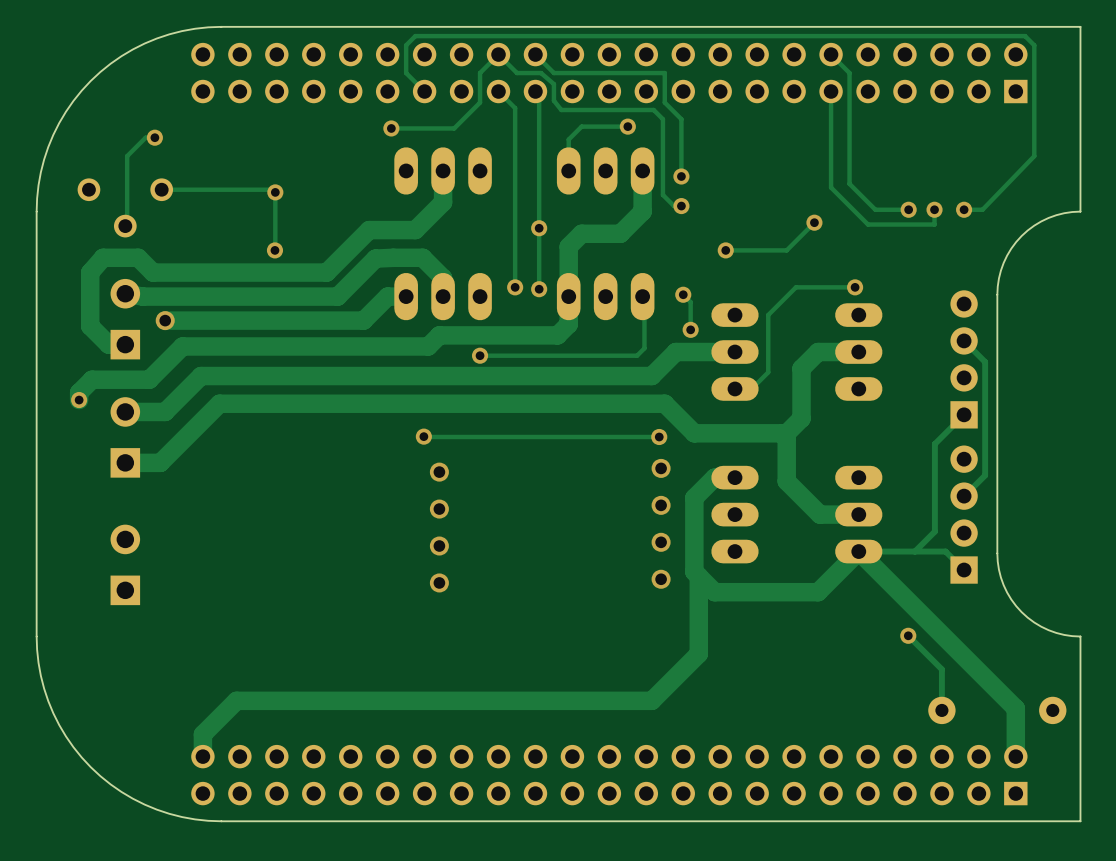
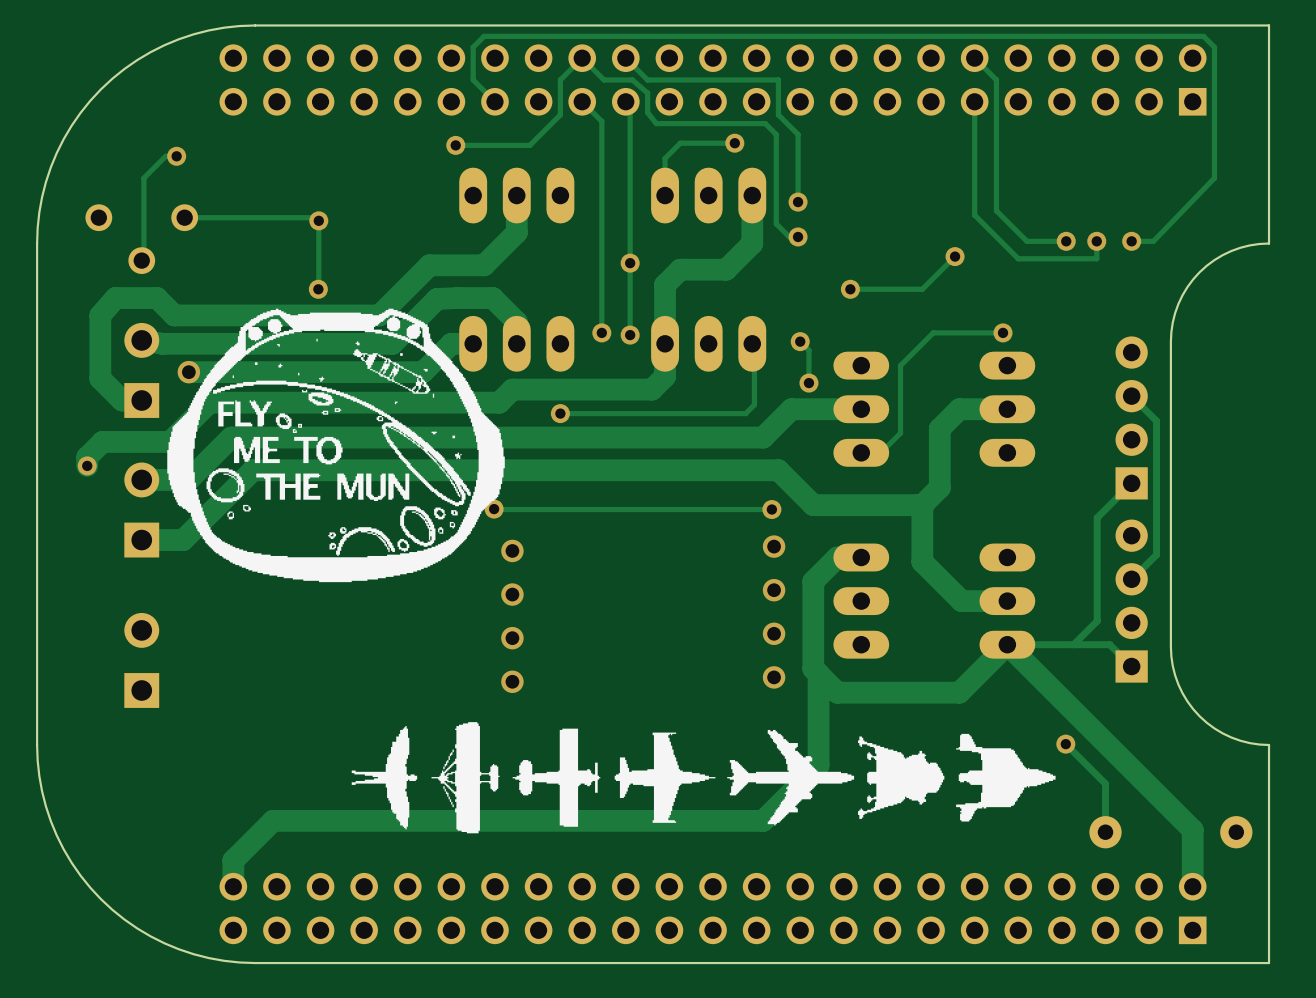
drawing: none -> [167, 308, 505, 583]
drawing: none -> [351, 722, 1056, 834]

